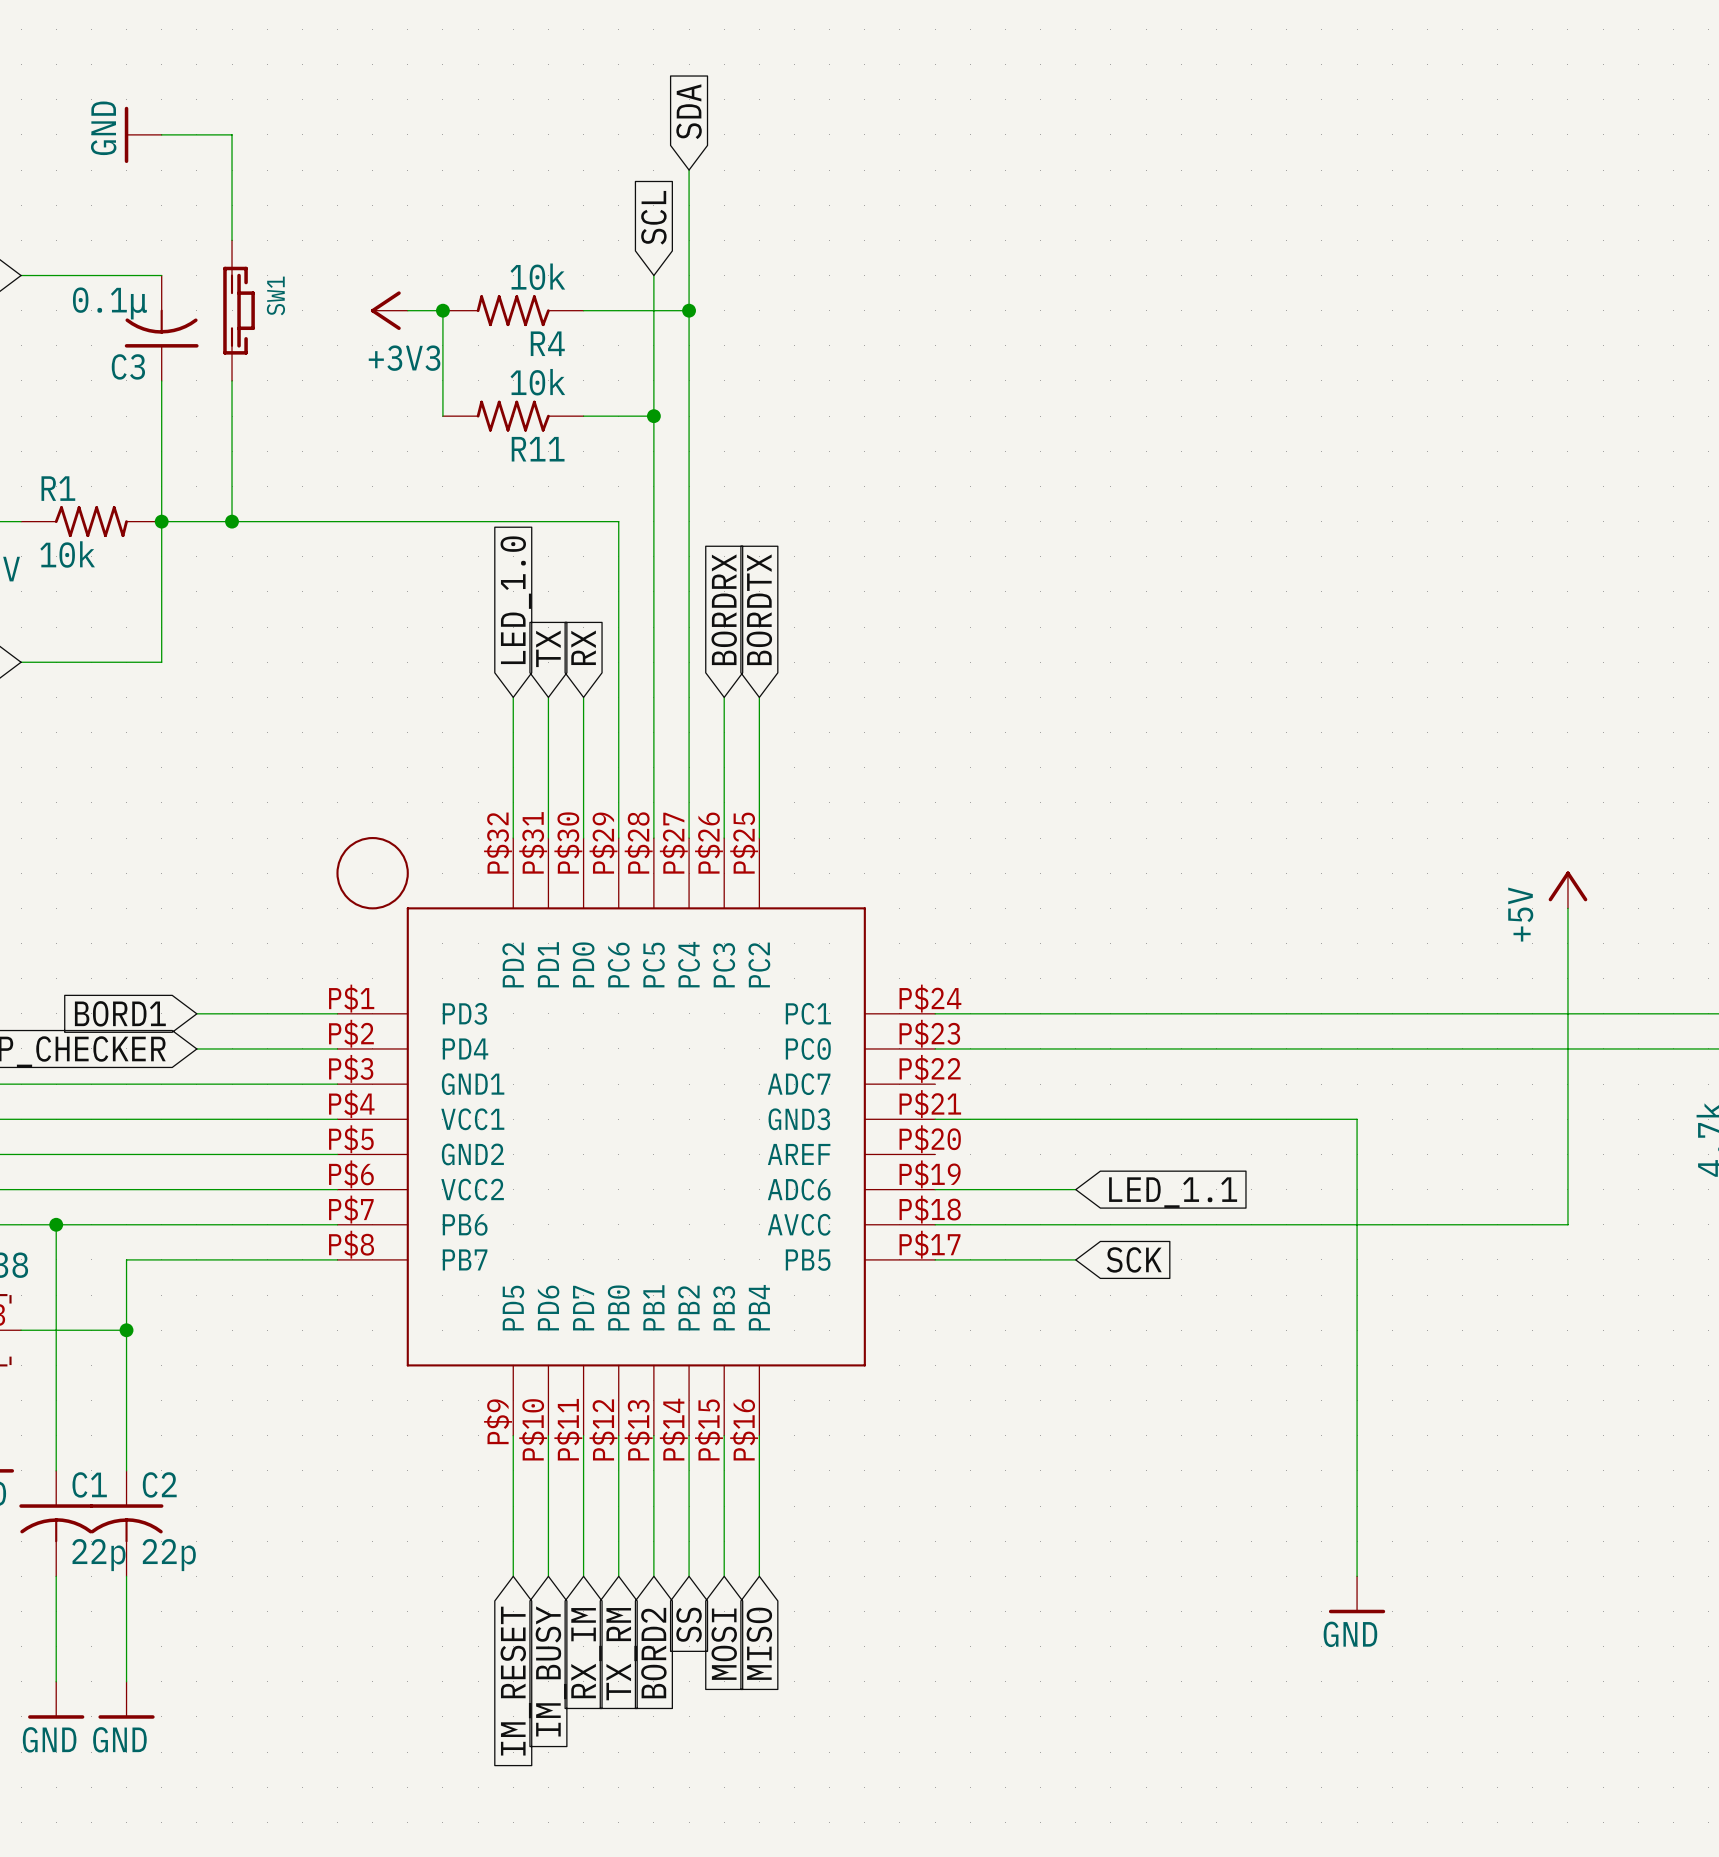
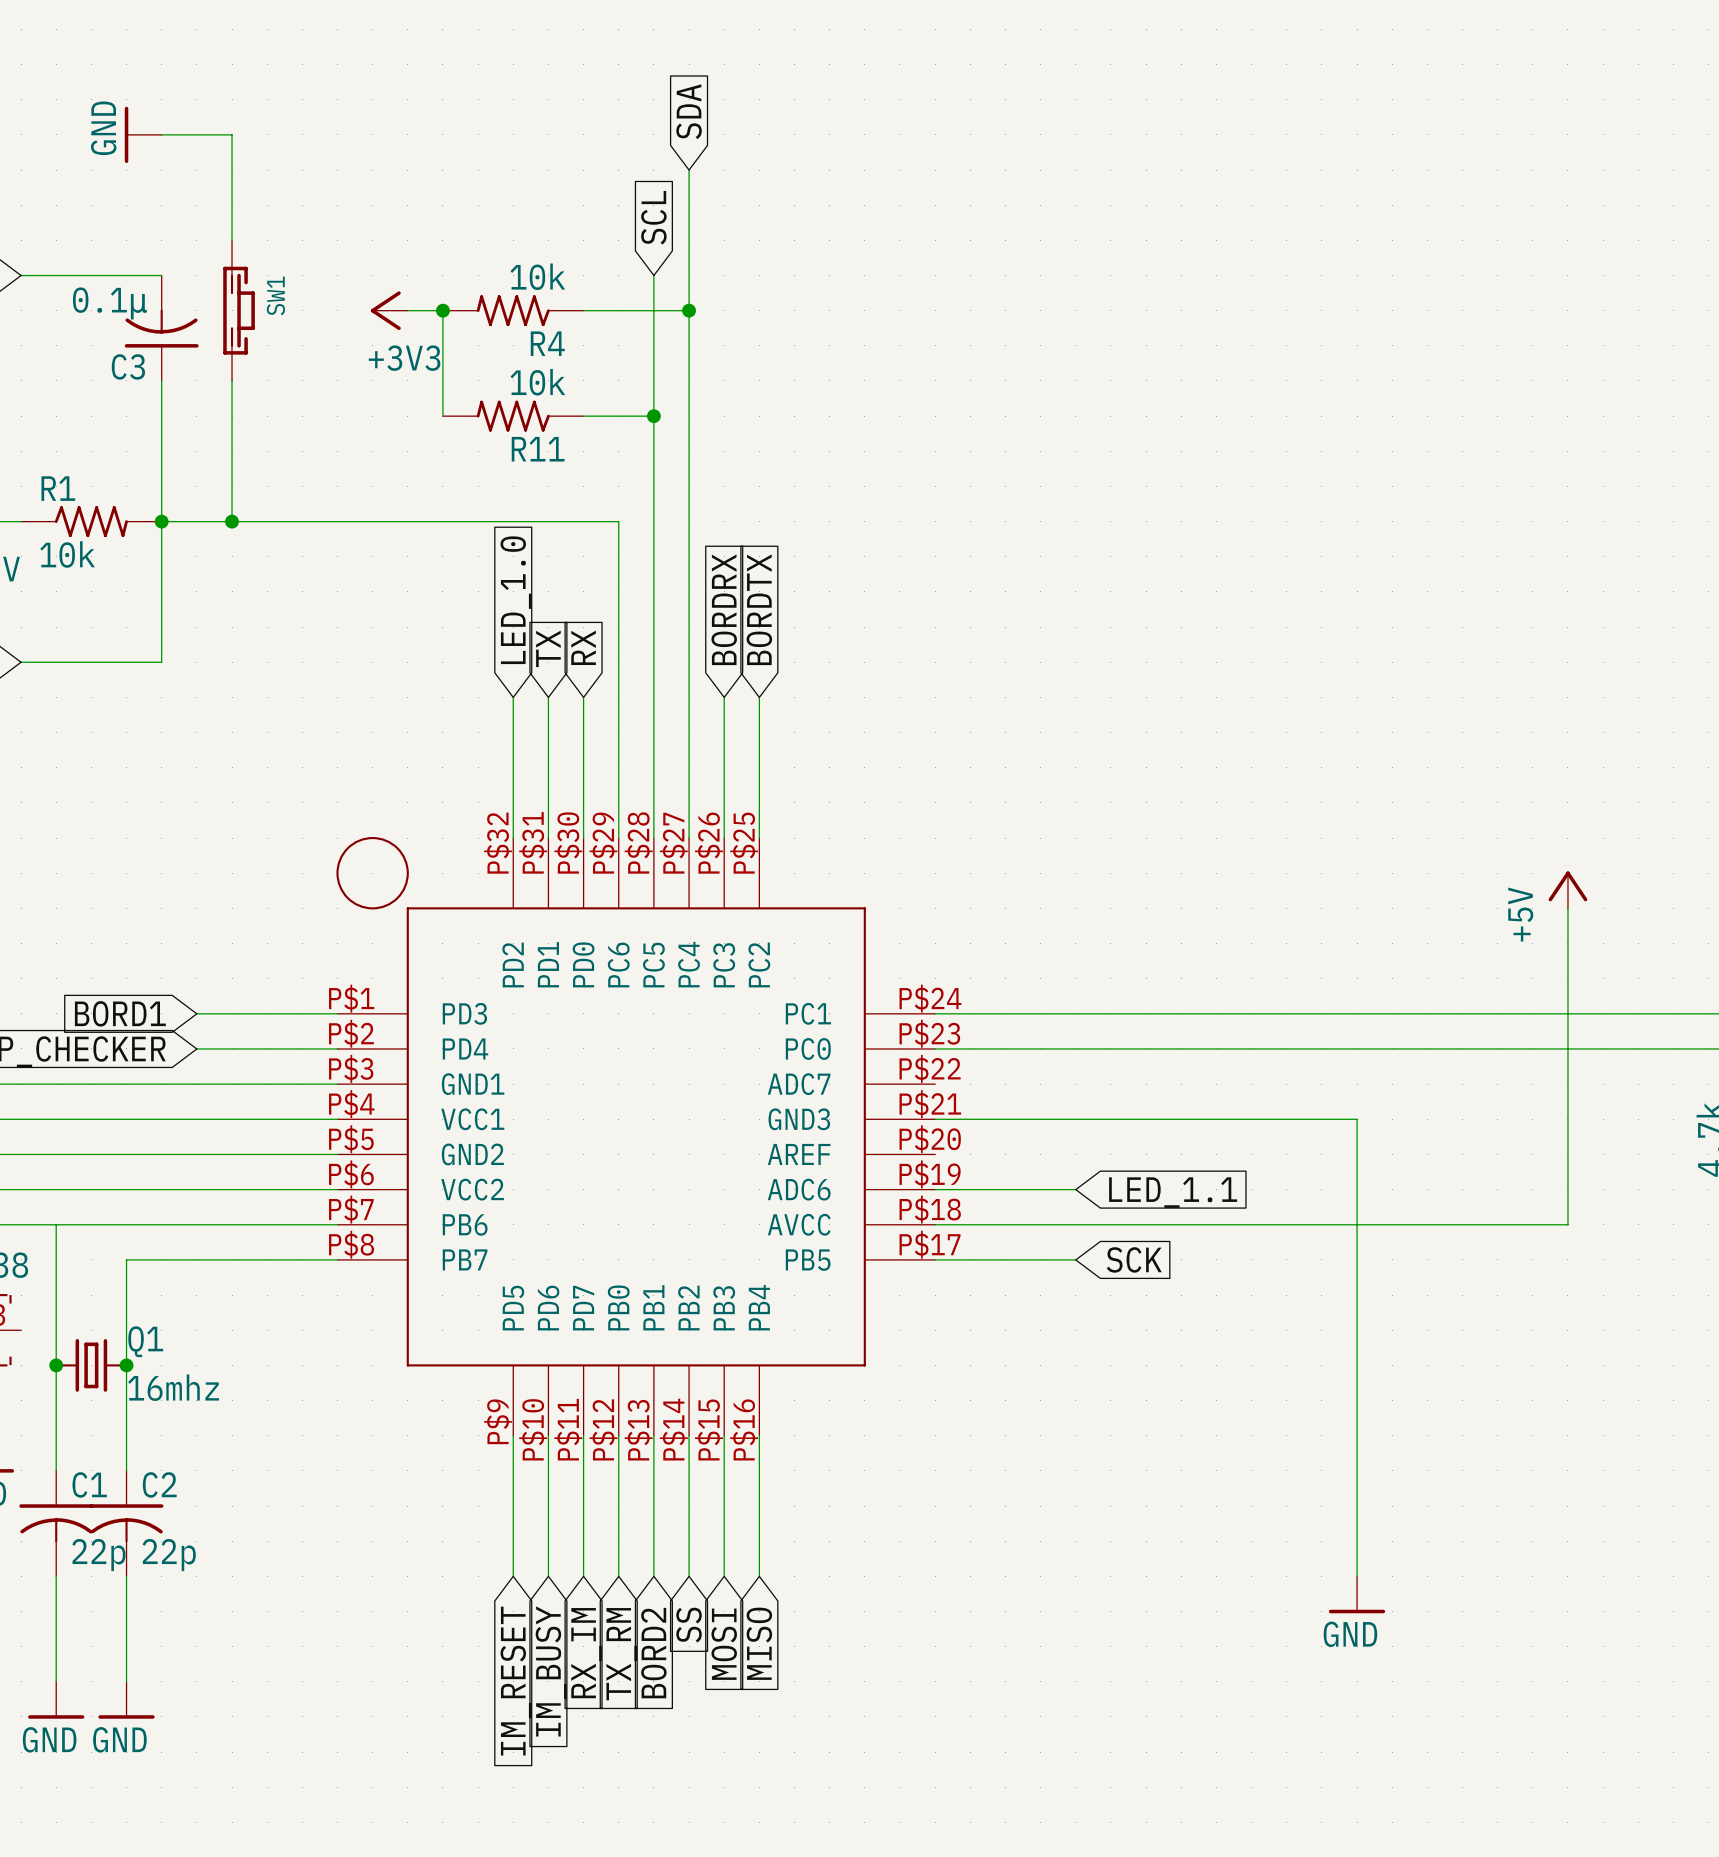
junction: (56, 1224) -> none
wire: (21, 1330) (126, 1330) -> none
junction position: (126, 1330) -> (126, 1365)
junction: none -> (56, 1365)
Q1: none -> 16mhz (91, 1365)

